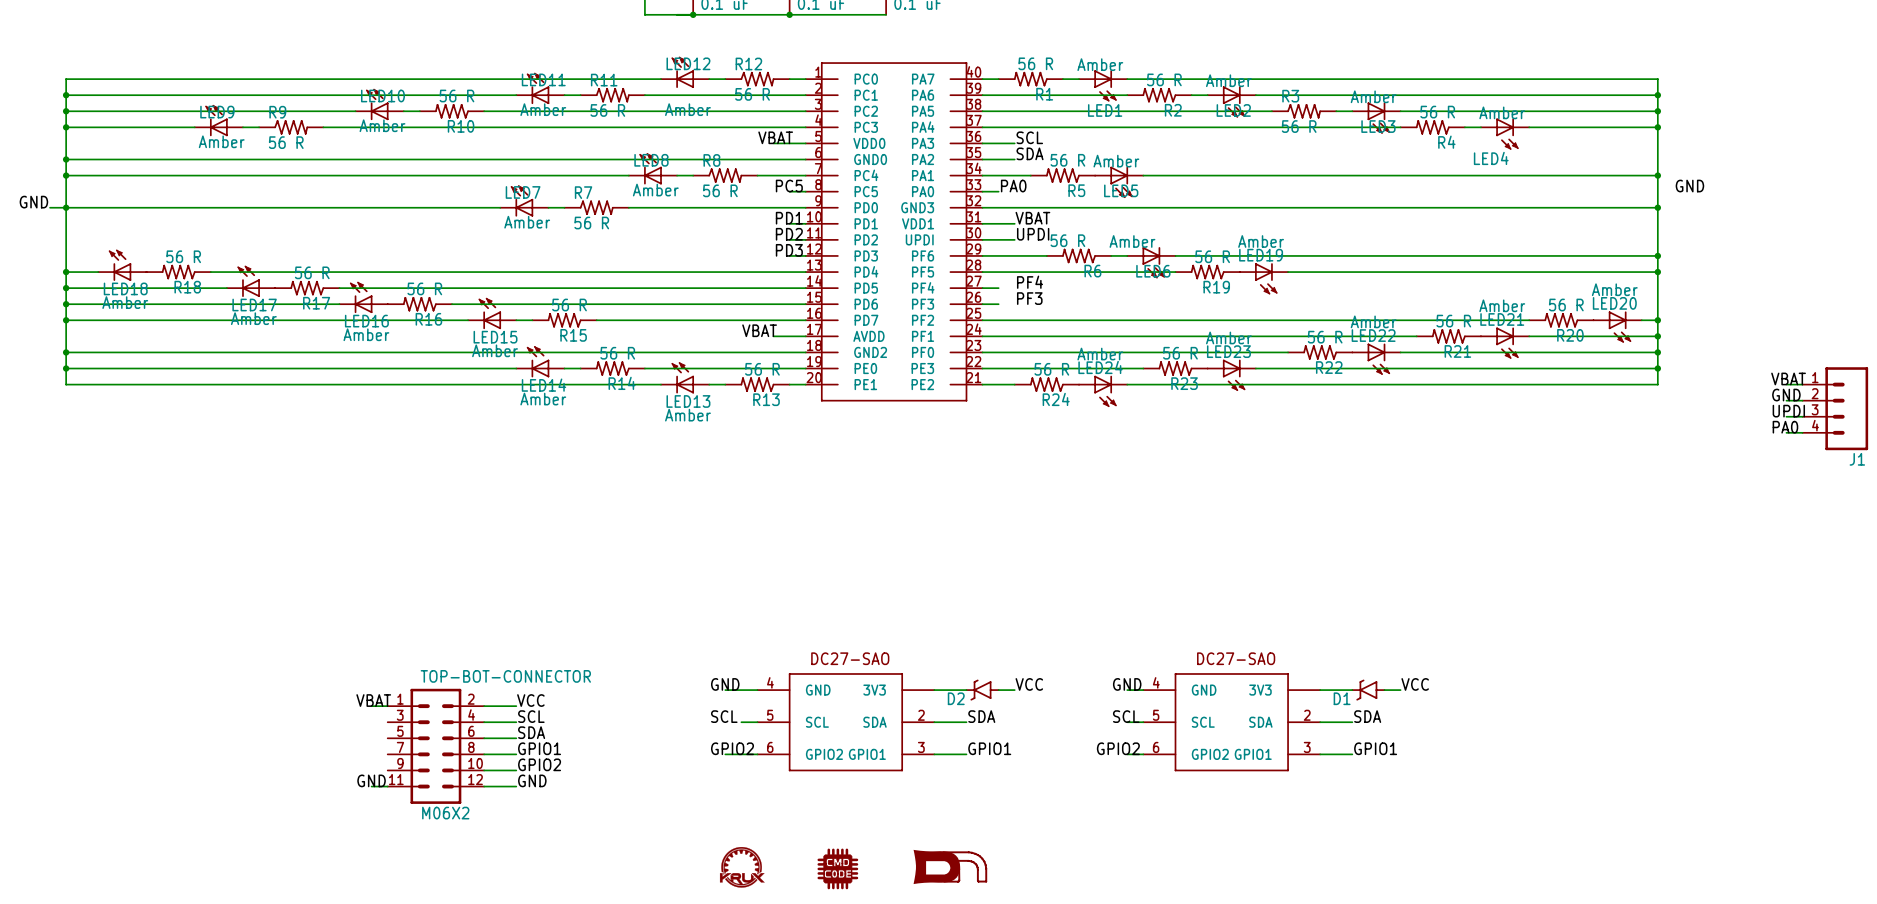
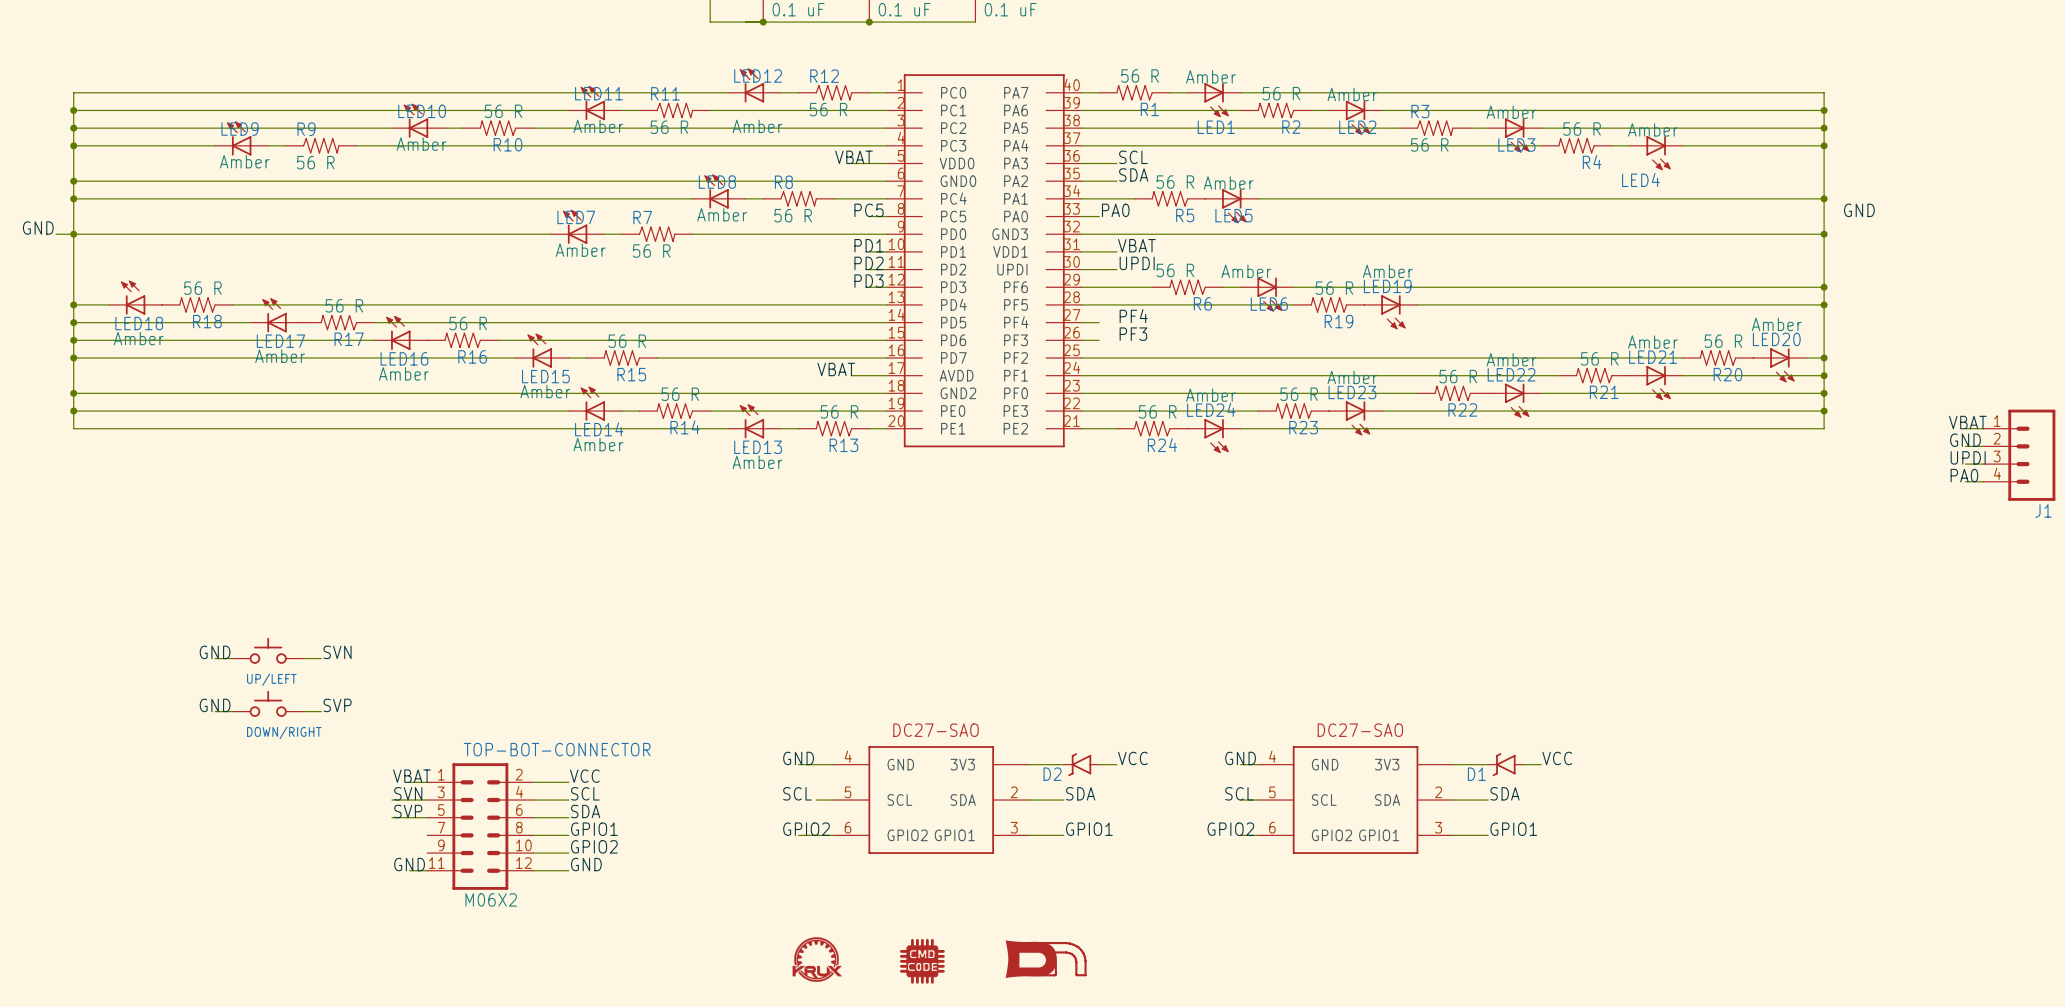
UP/LEFT: none -> (268, 650)
label: none -> GND (215, 652)
label: none -> SVN (337, 652)
wire: none -> (215, 658) (232, 658)
wire: none -> (303, 658) (321, 658)
DOWN/RIGHT: none -> (268, 703)
label: none -> GND (215, 705)
label: none -> SVP (337, 705)
wire: none -> (215, 711) (232, 711)
wire: none -> (303, 711) (321, 711)
label: none -> SVN (408, 793)
wire: none -> (391, 800) (427, 800)
label: none -> SVP (408, 811)
wire: none -> (391, 817) (427, 817)

